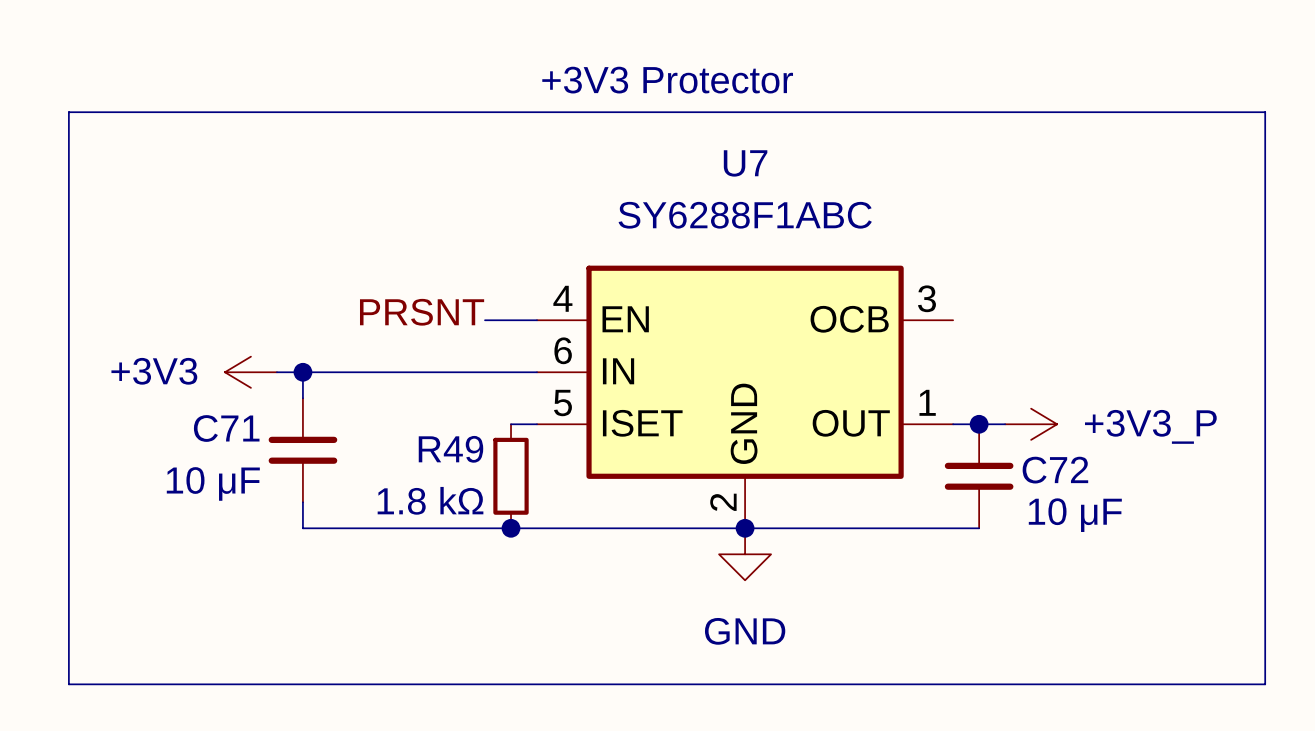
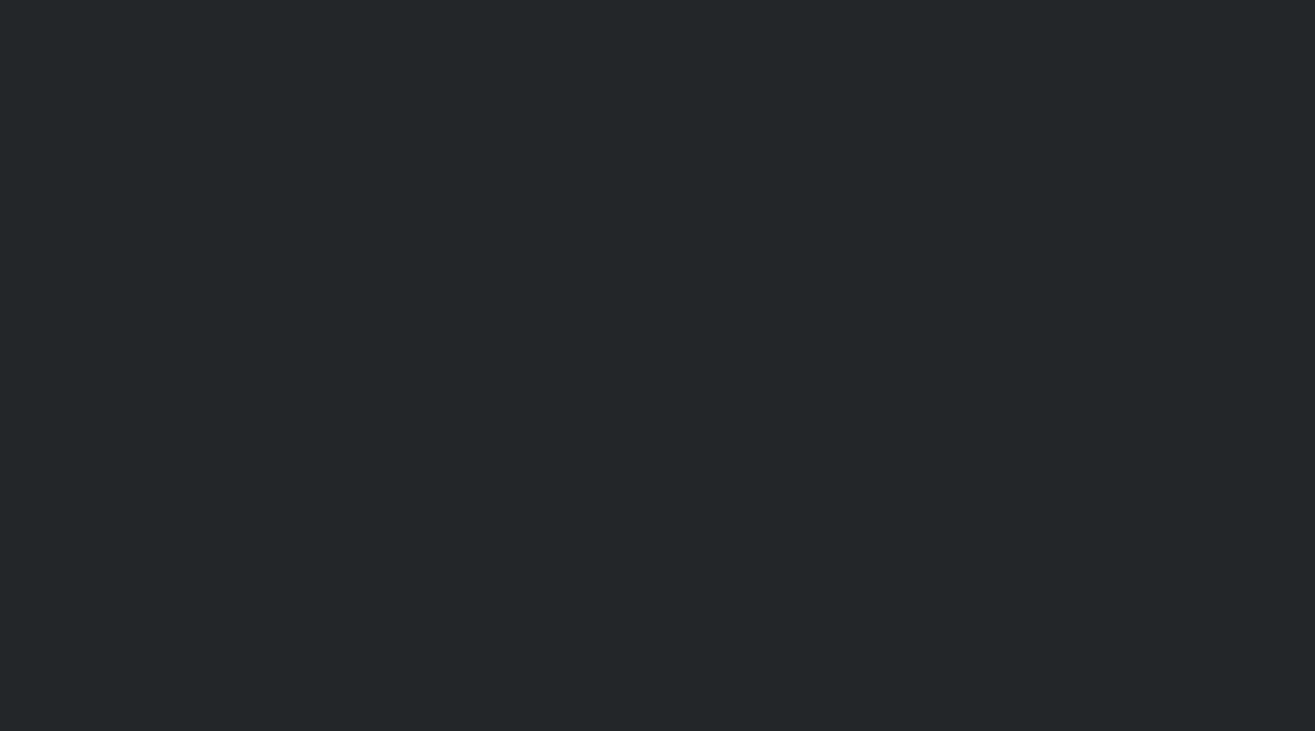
text: +3V3 Protector (667, 80) -> none
line: (68, 112) (1265, 112) (1265, 684) (68, 684) (68, 112) -> none
label: PRSNT (422, 312) -> none
wire: (485, 320) (537, 320) -> none
power symbol: +3V3 (250, 372) -> none
wire: (276, 372) (537, 372) -> none
wire: (302, 372) (302, 398) -> none
junction: (302, 372) -> none
U7: SY6288F1ABC (745, 396) -> none
wire: (511, 424) (537, 424) -> none
wire: (953, 424) (1005, 424) -> none
junction: (979, 424) -> none
power symbol: +3V3_P (1031, 424) -> none
C71: 10 μF (302, 450) -> none
R49: 1.8 kΩ (511, 476) -> none
C72: 10 μF (979, 476) -> none
wire: (302, 502) (302, 528) (979, 528) -> none
junction: (511, 528) -> none
junction: (745, 528) -> none
power symbol: GND (745, 554) -> none

